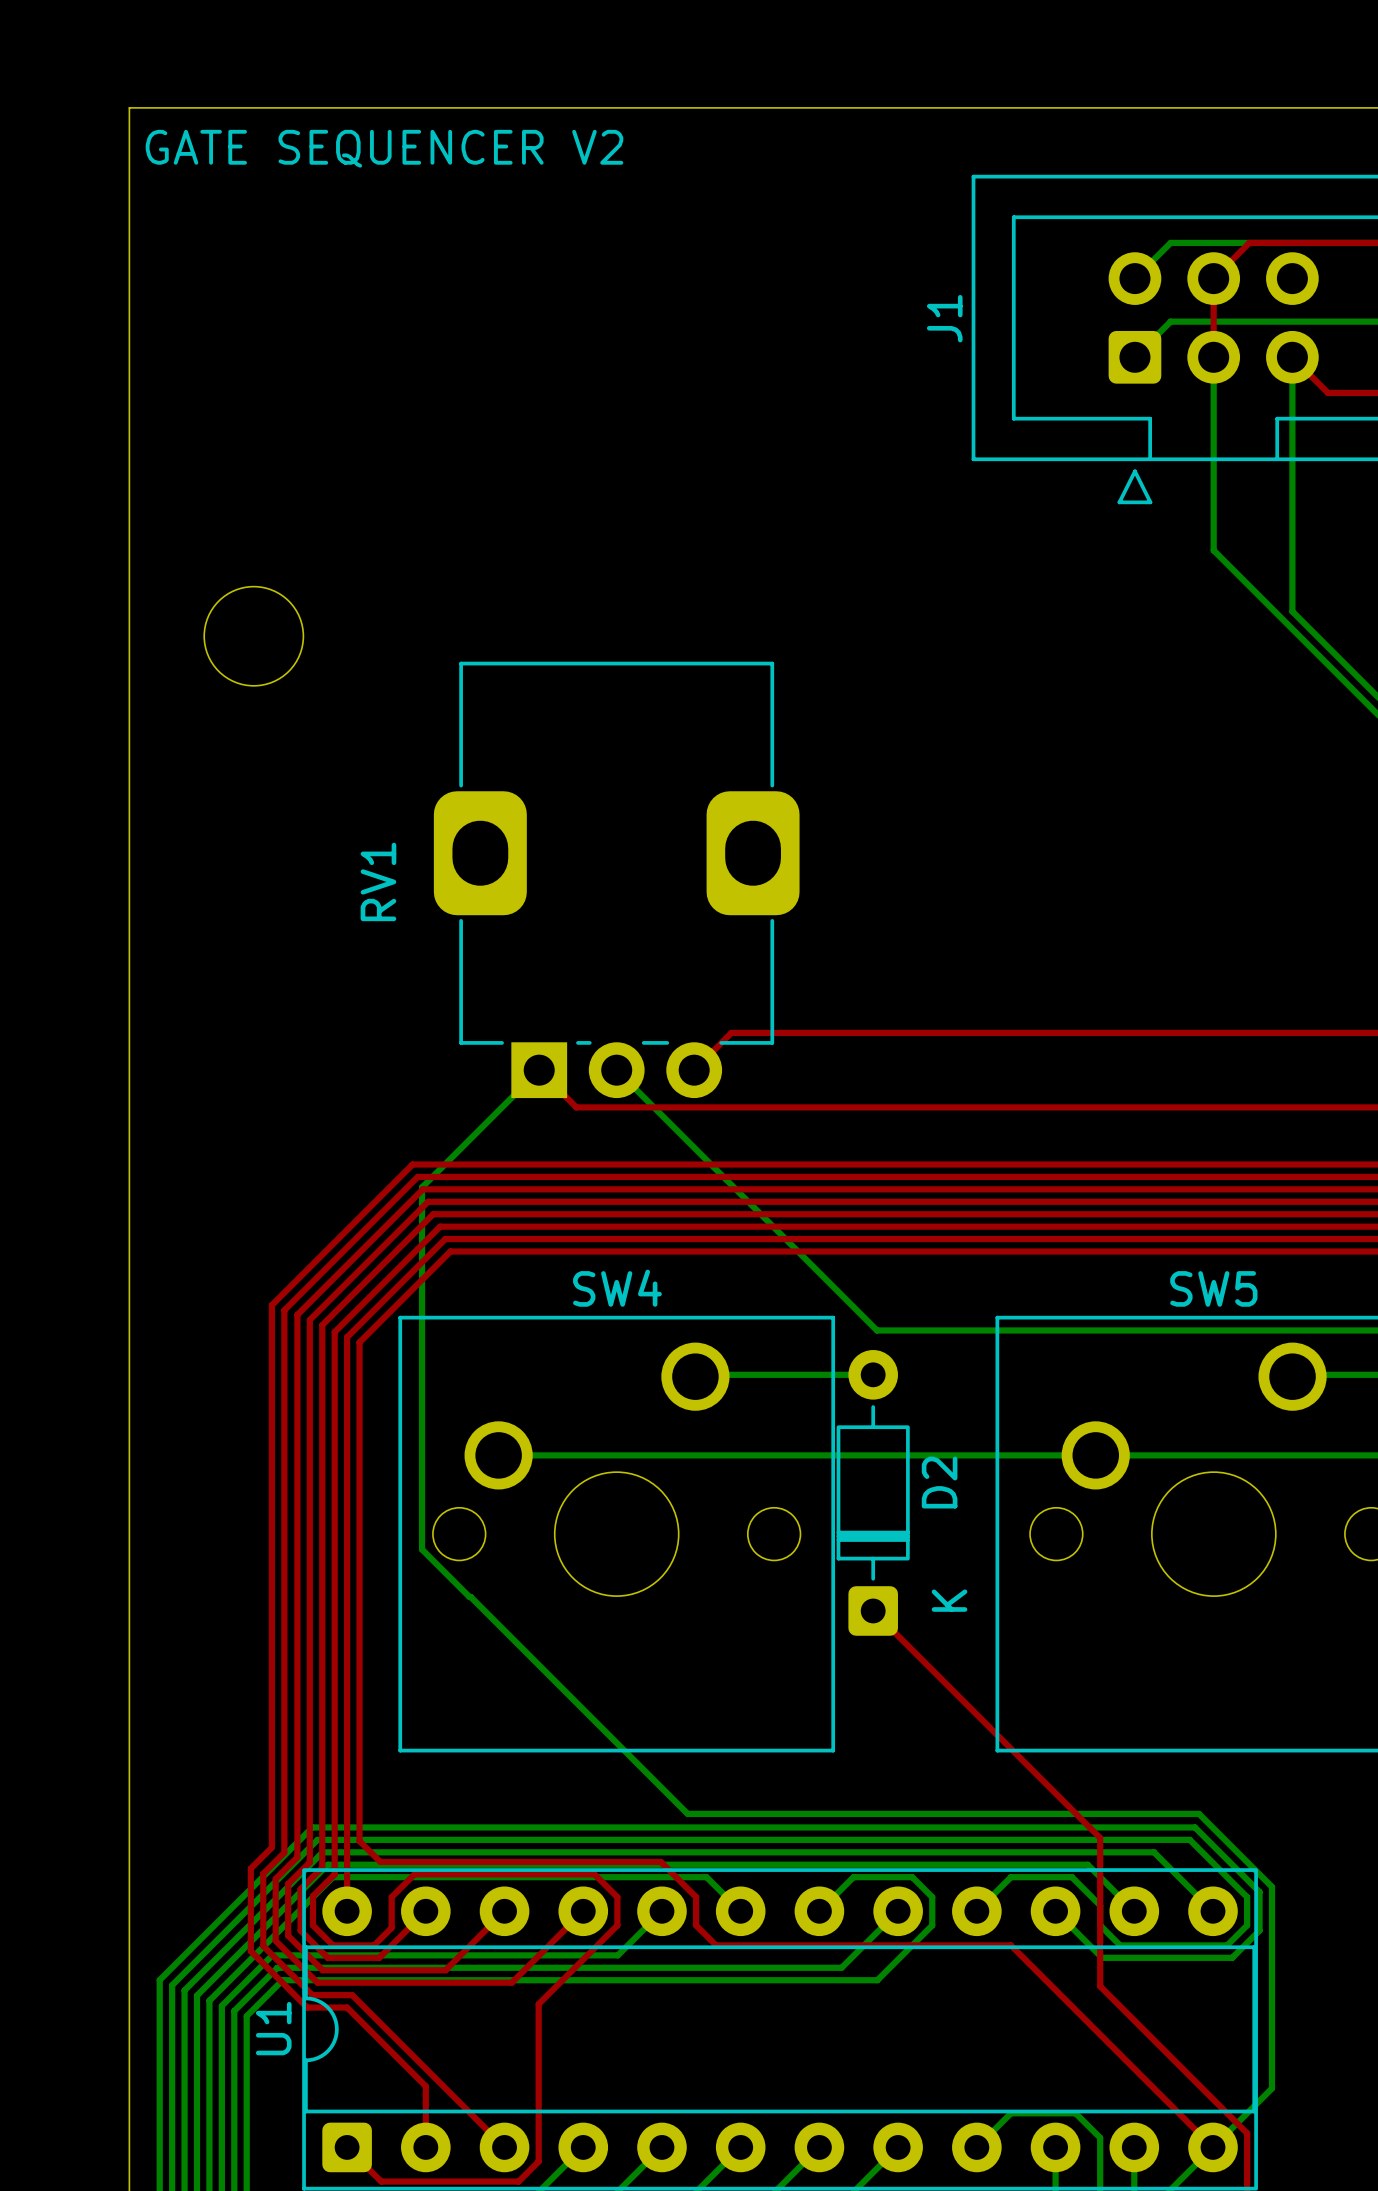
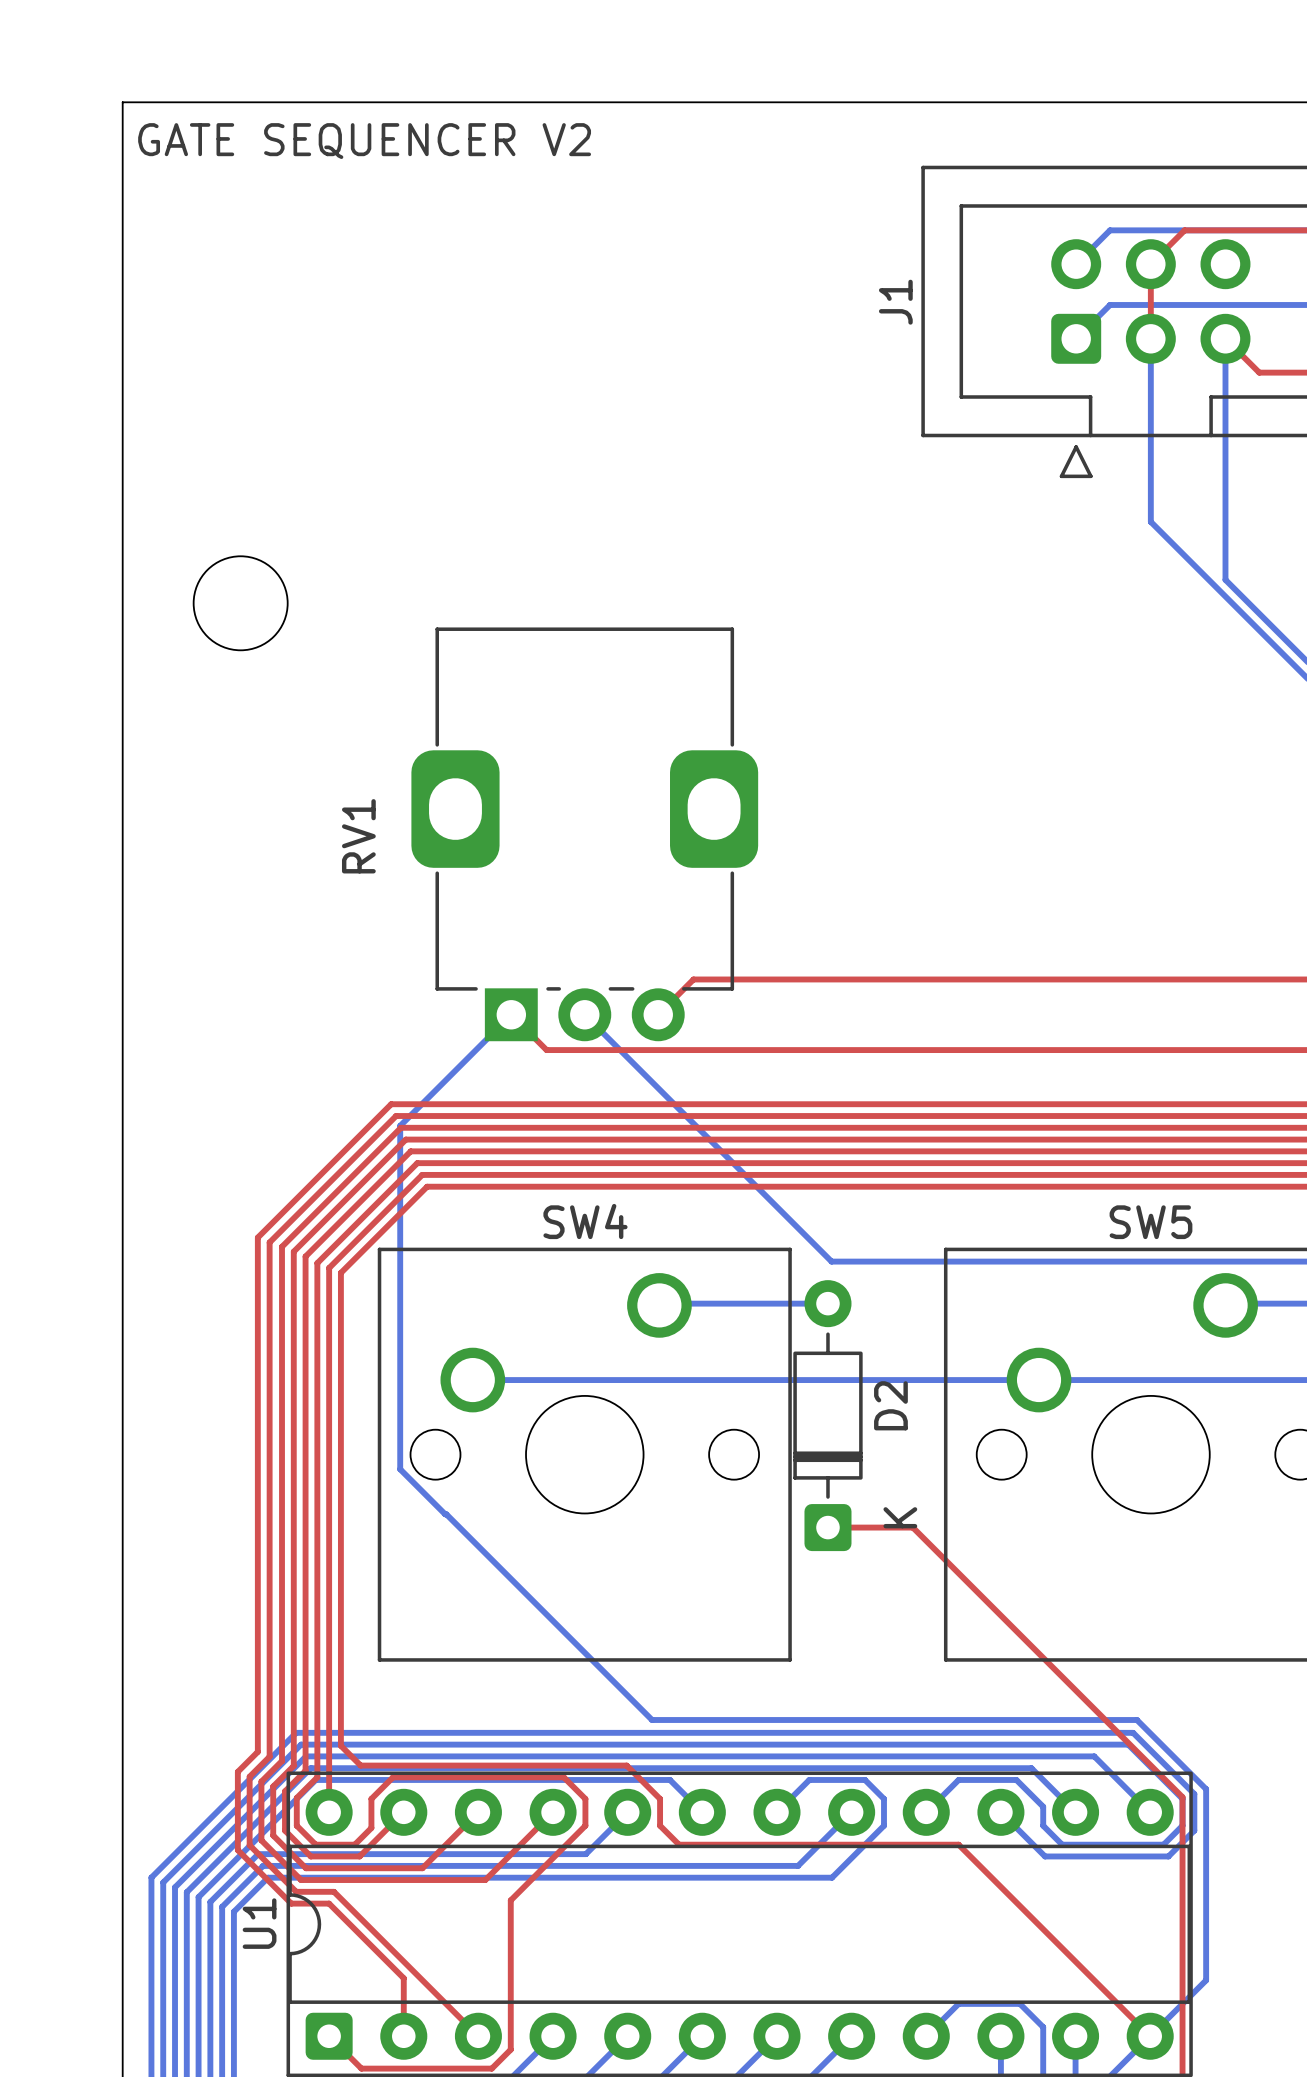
top track: (873, 1610) (1100, 1837) (1100, 1986) (1247, 2133) -> (827, 1527) (912, 1527) (1182, 1797) (1182, 2022)

